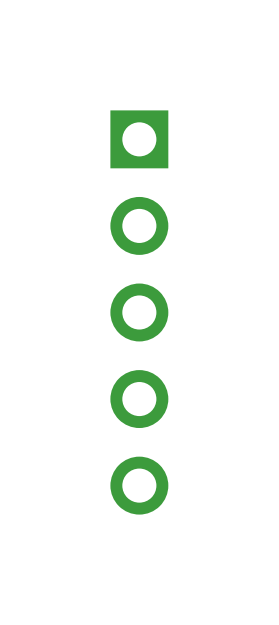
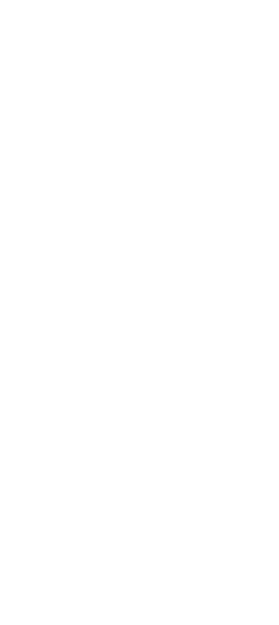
part: (139, 312) -> none

